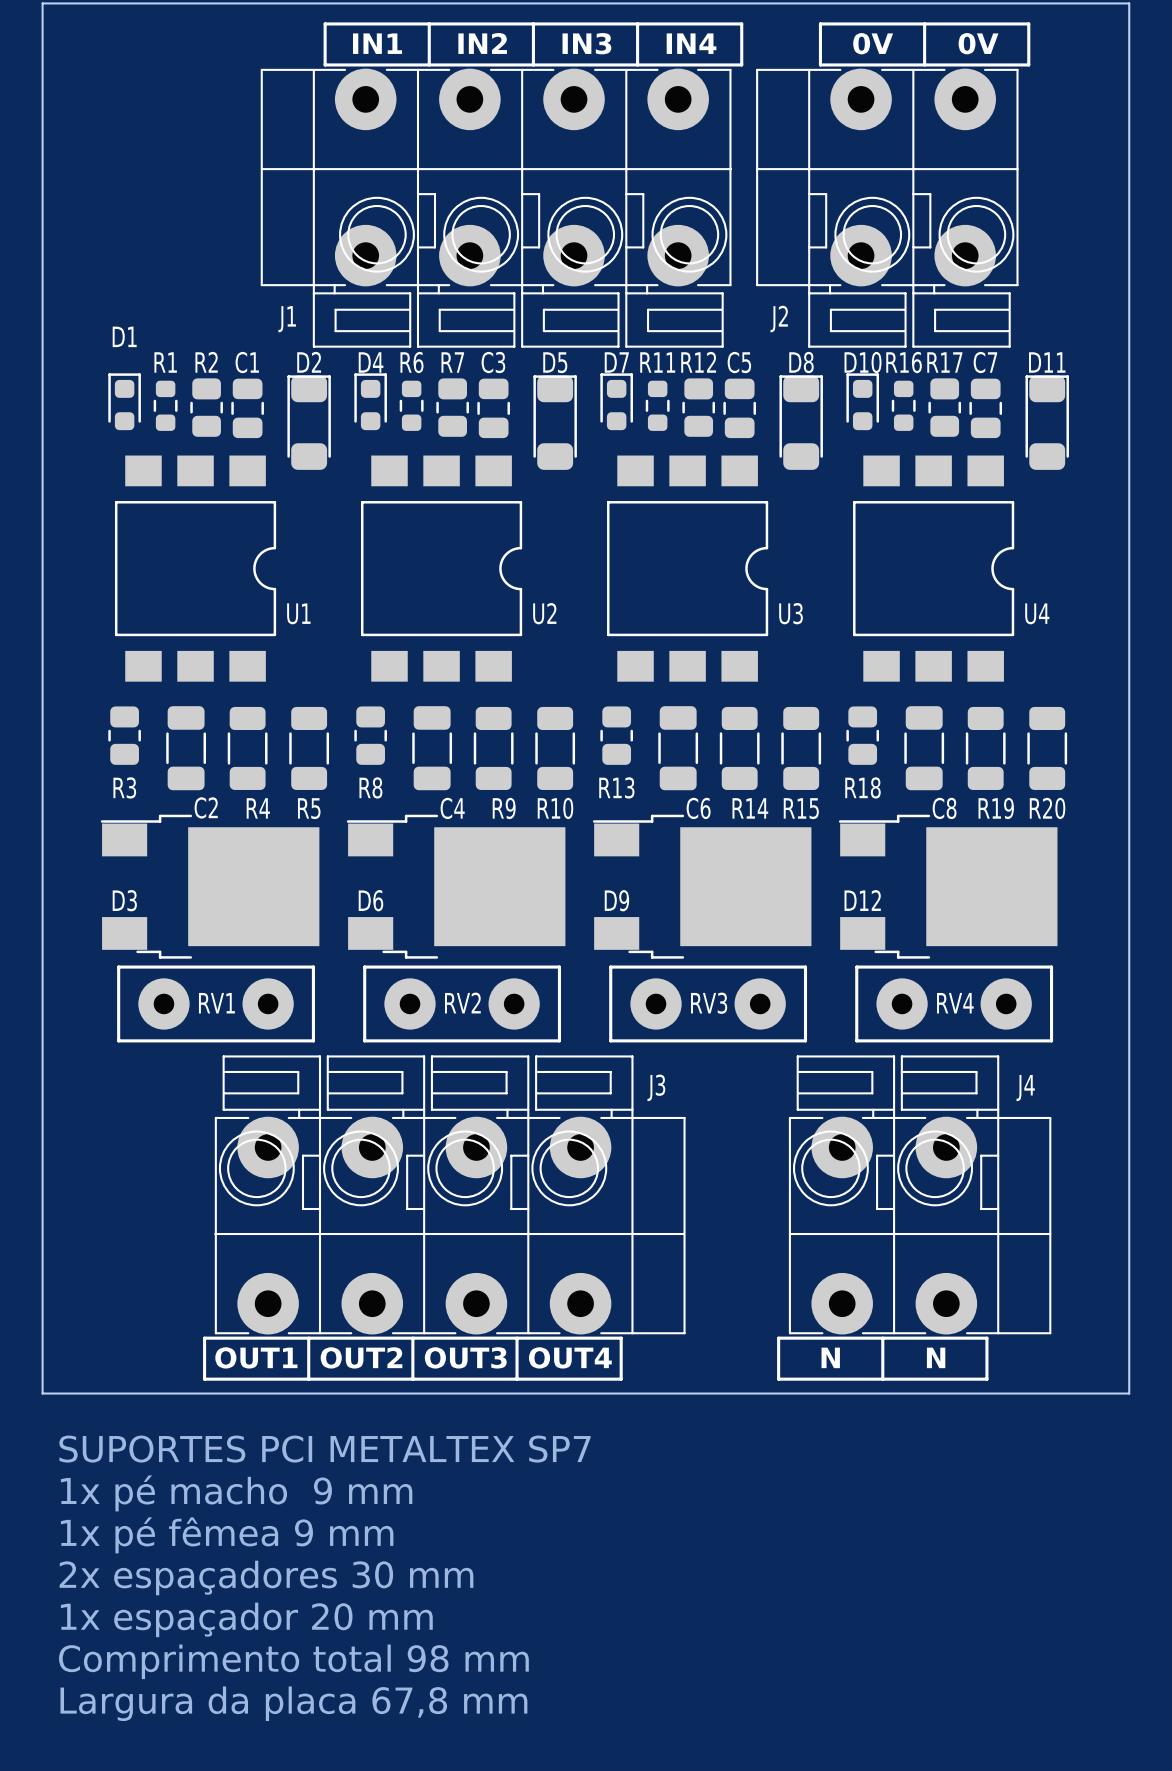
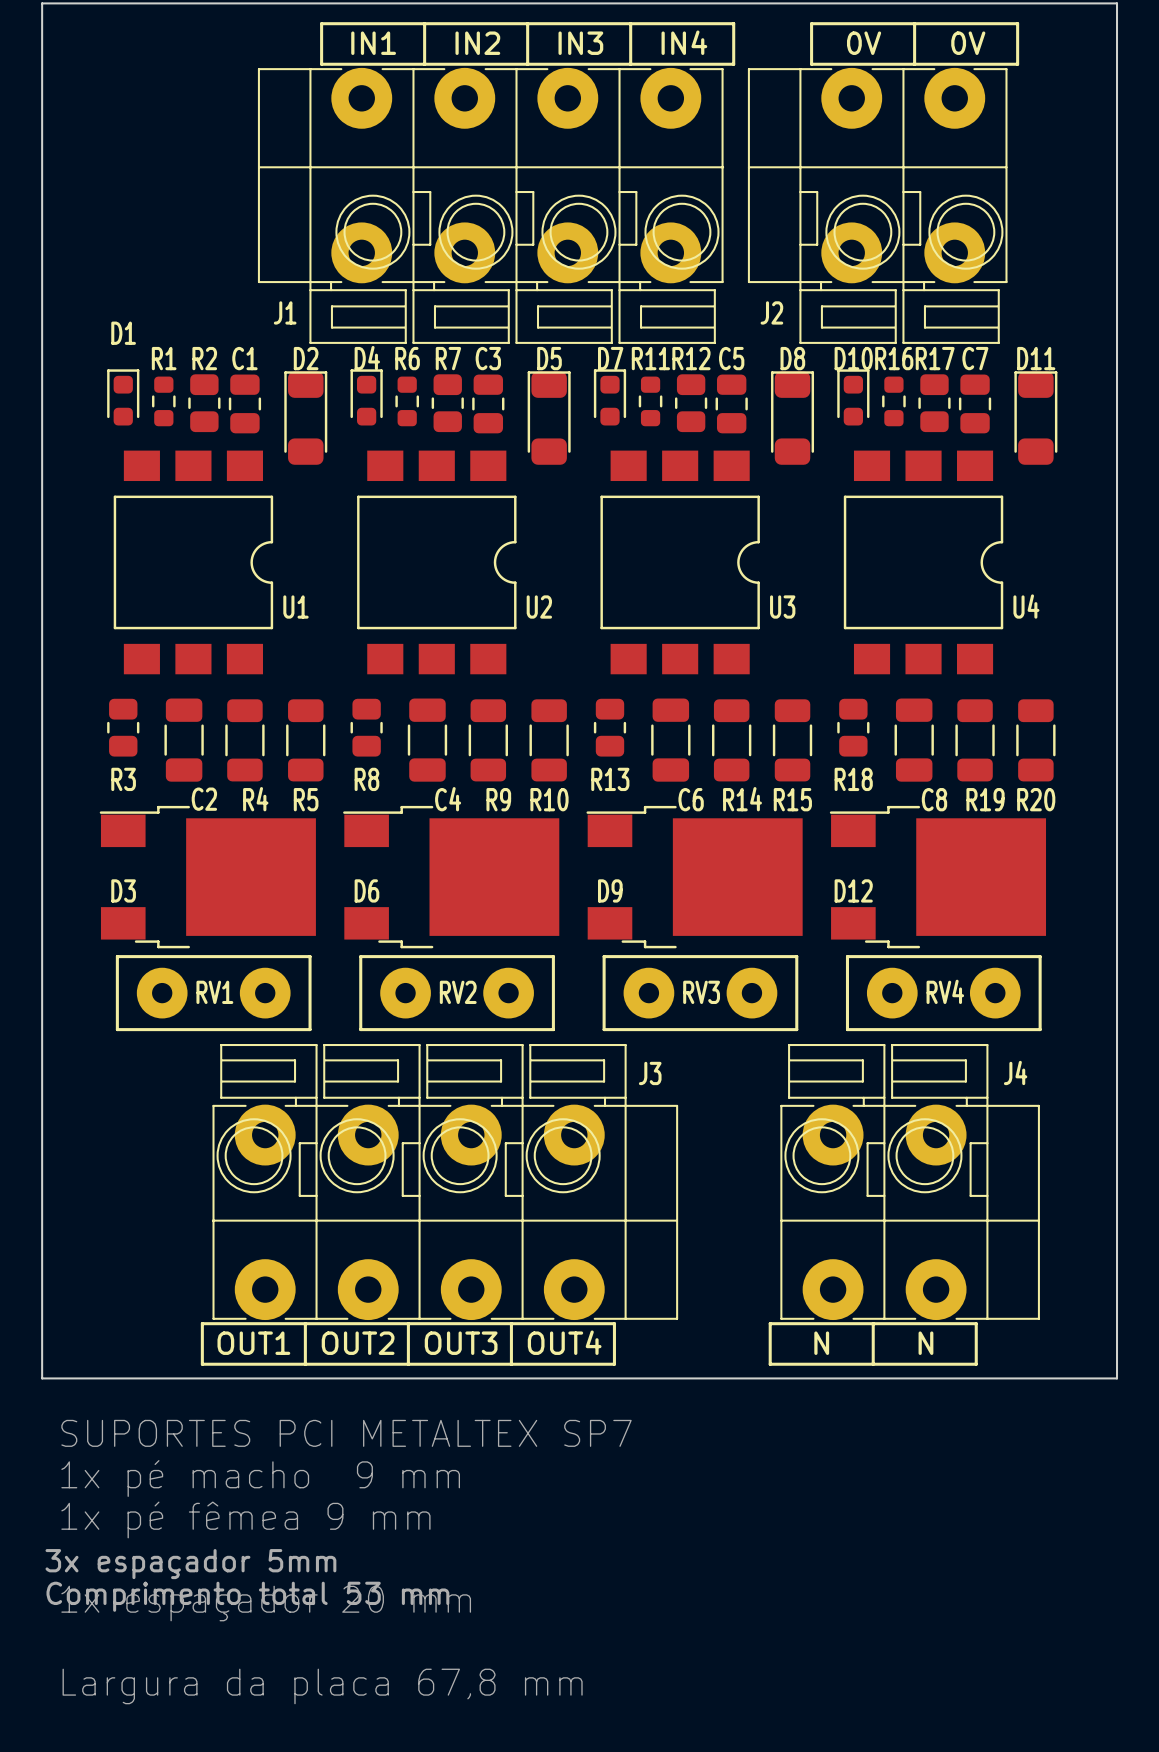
text: 2x espaçadores 30 mm (266, 1577) -> 3x espaçador 5mm (190, 1564)
text: Comprimento total 98 mm (293, 1661) -> Comprimento total 53 mm (247, 1596)

